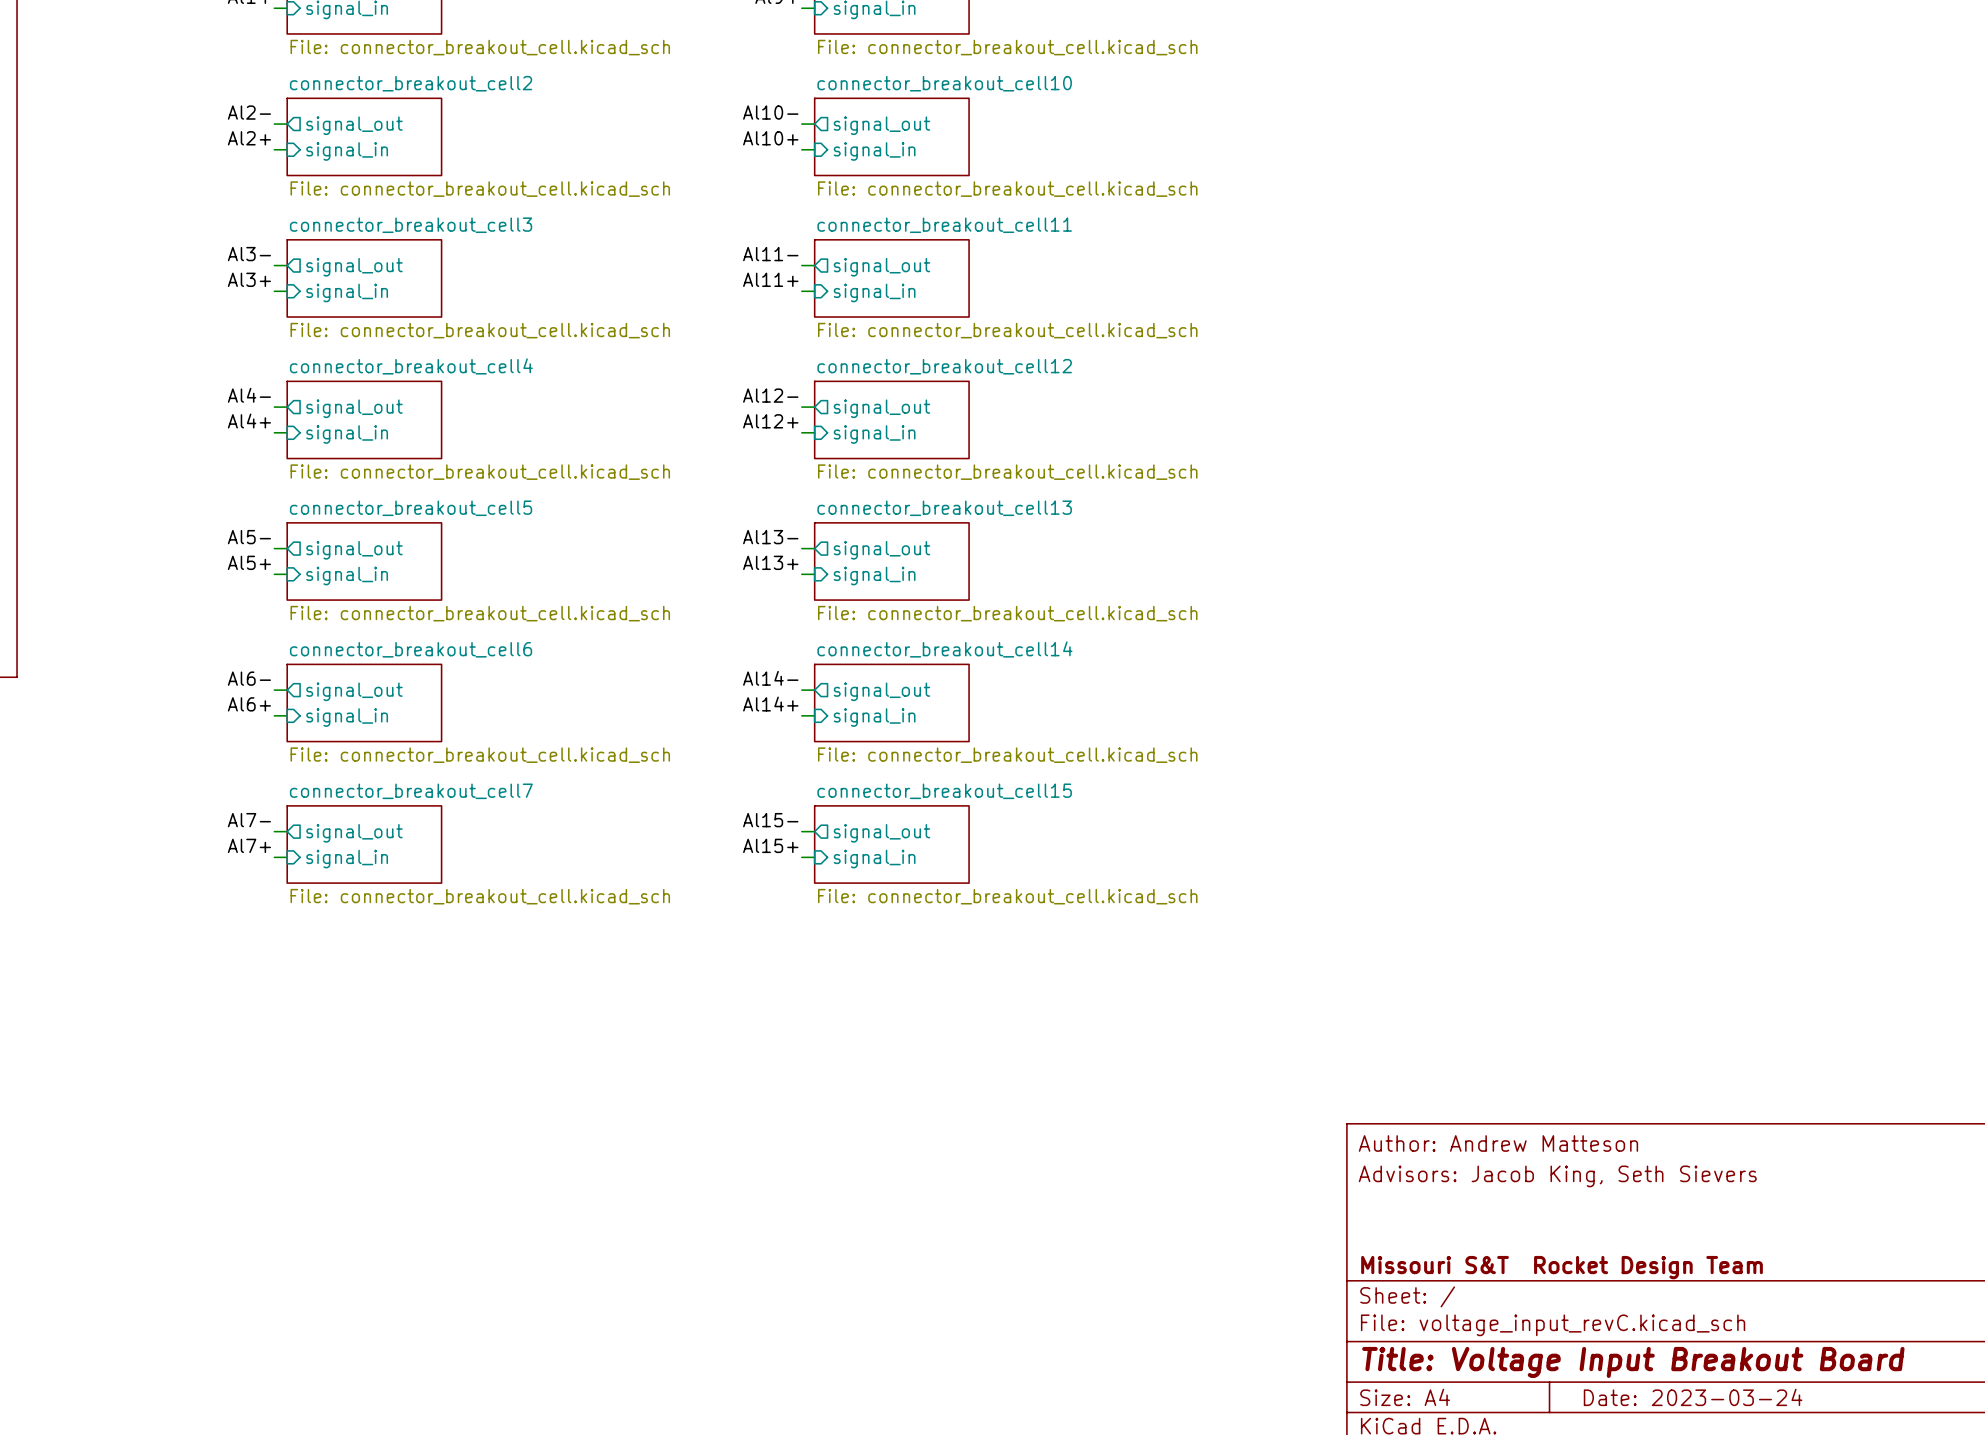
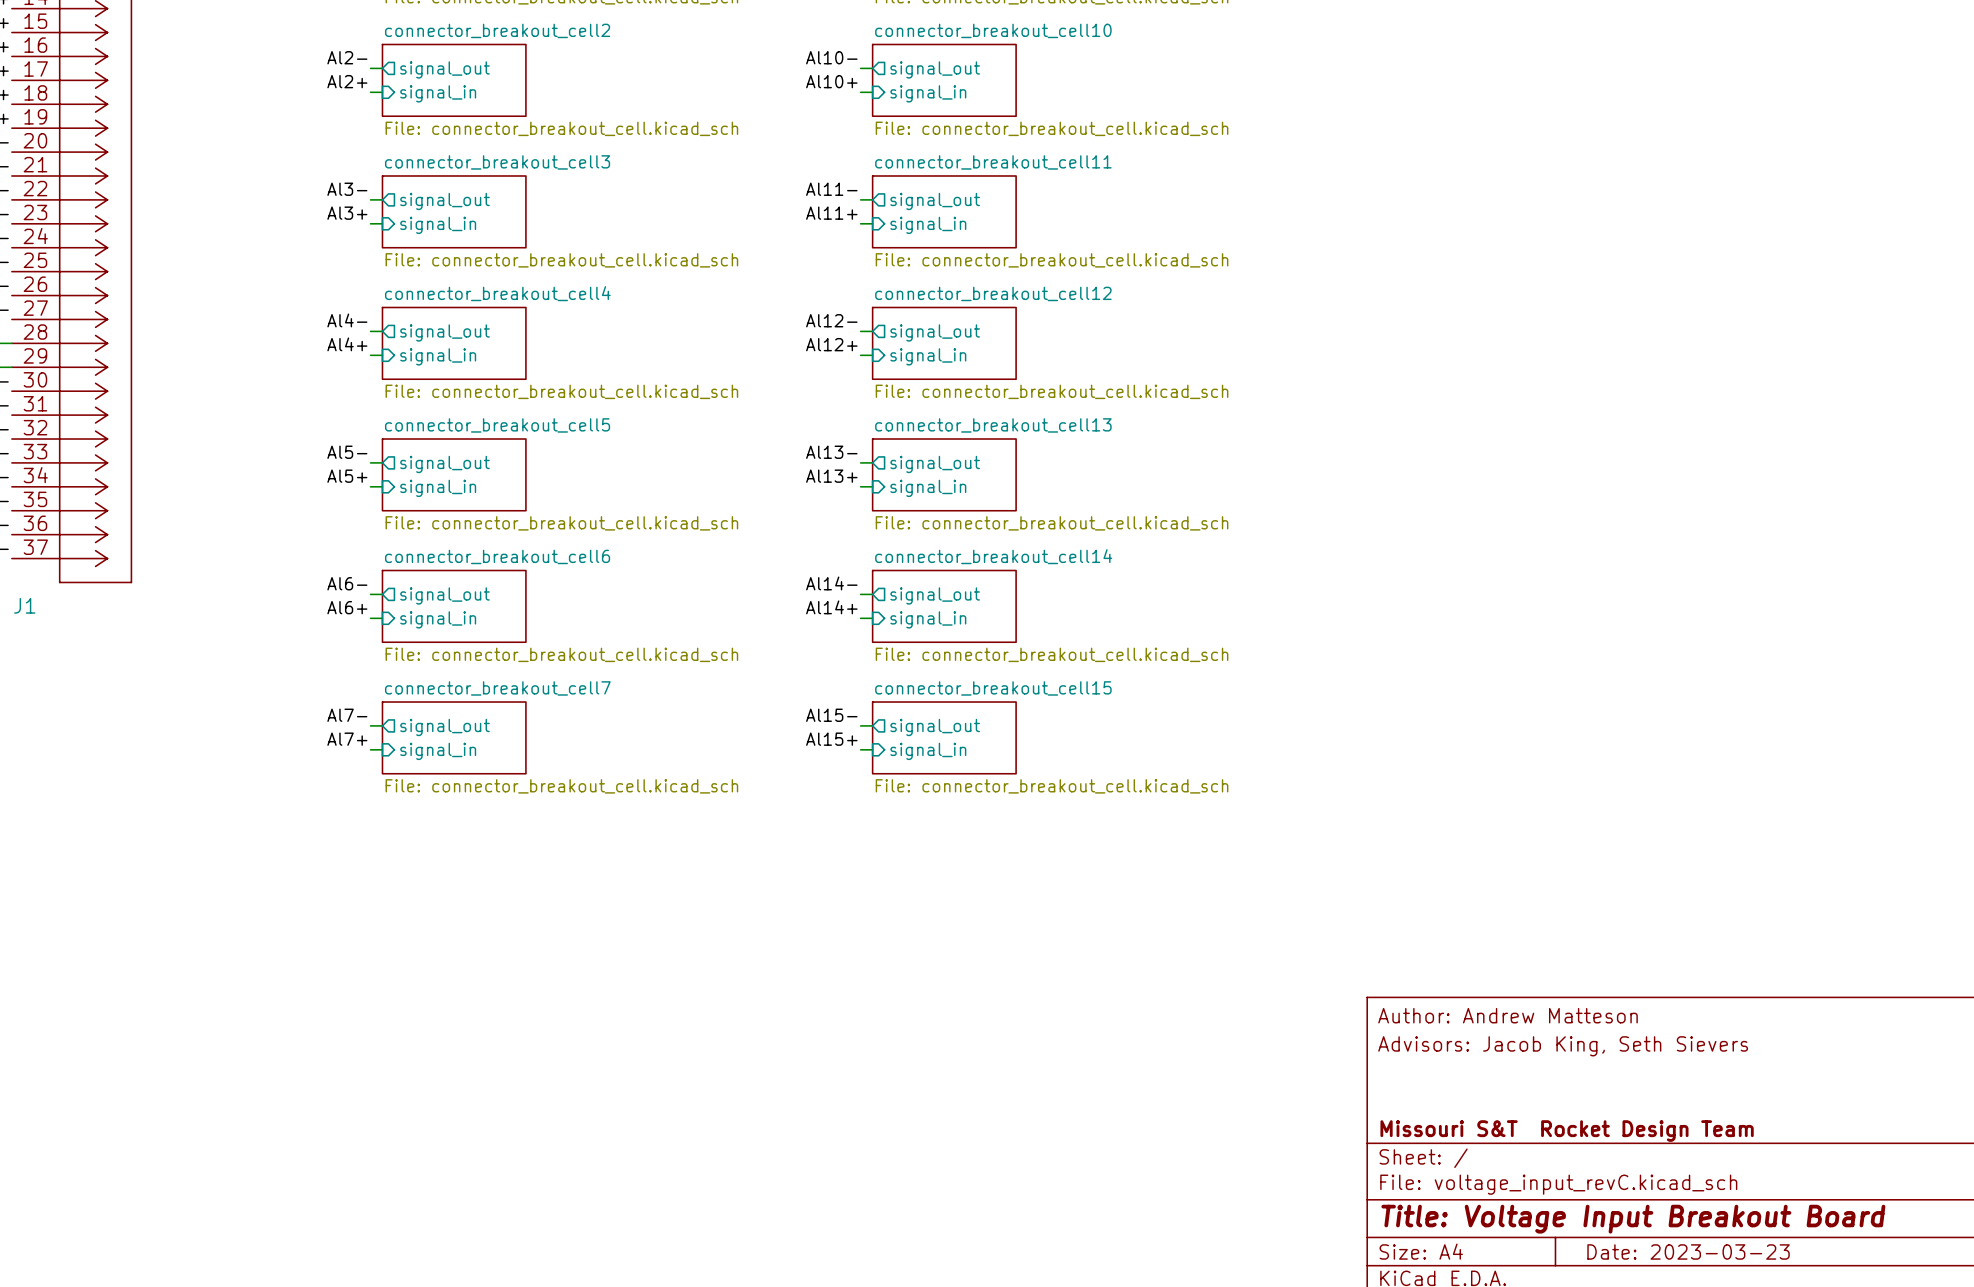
title block: Date: 2023-03-24 (1693, 1397) -> Date: 2023-03-23 (1688, 1251)

